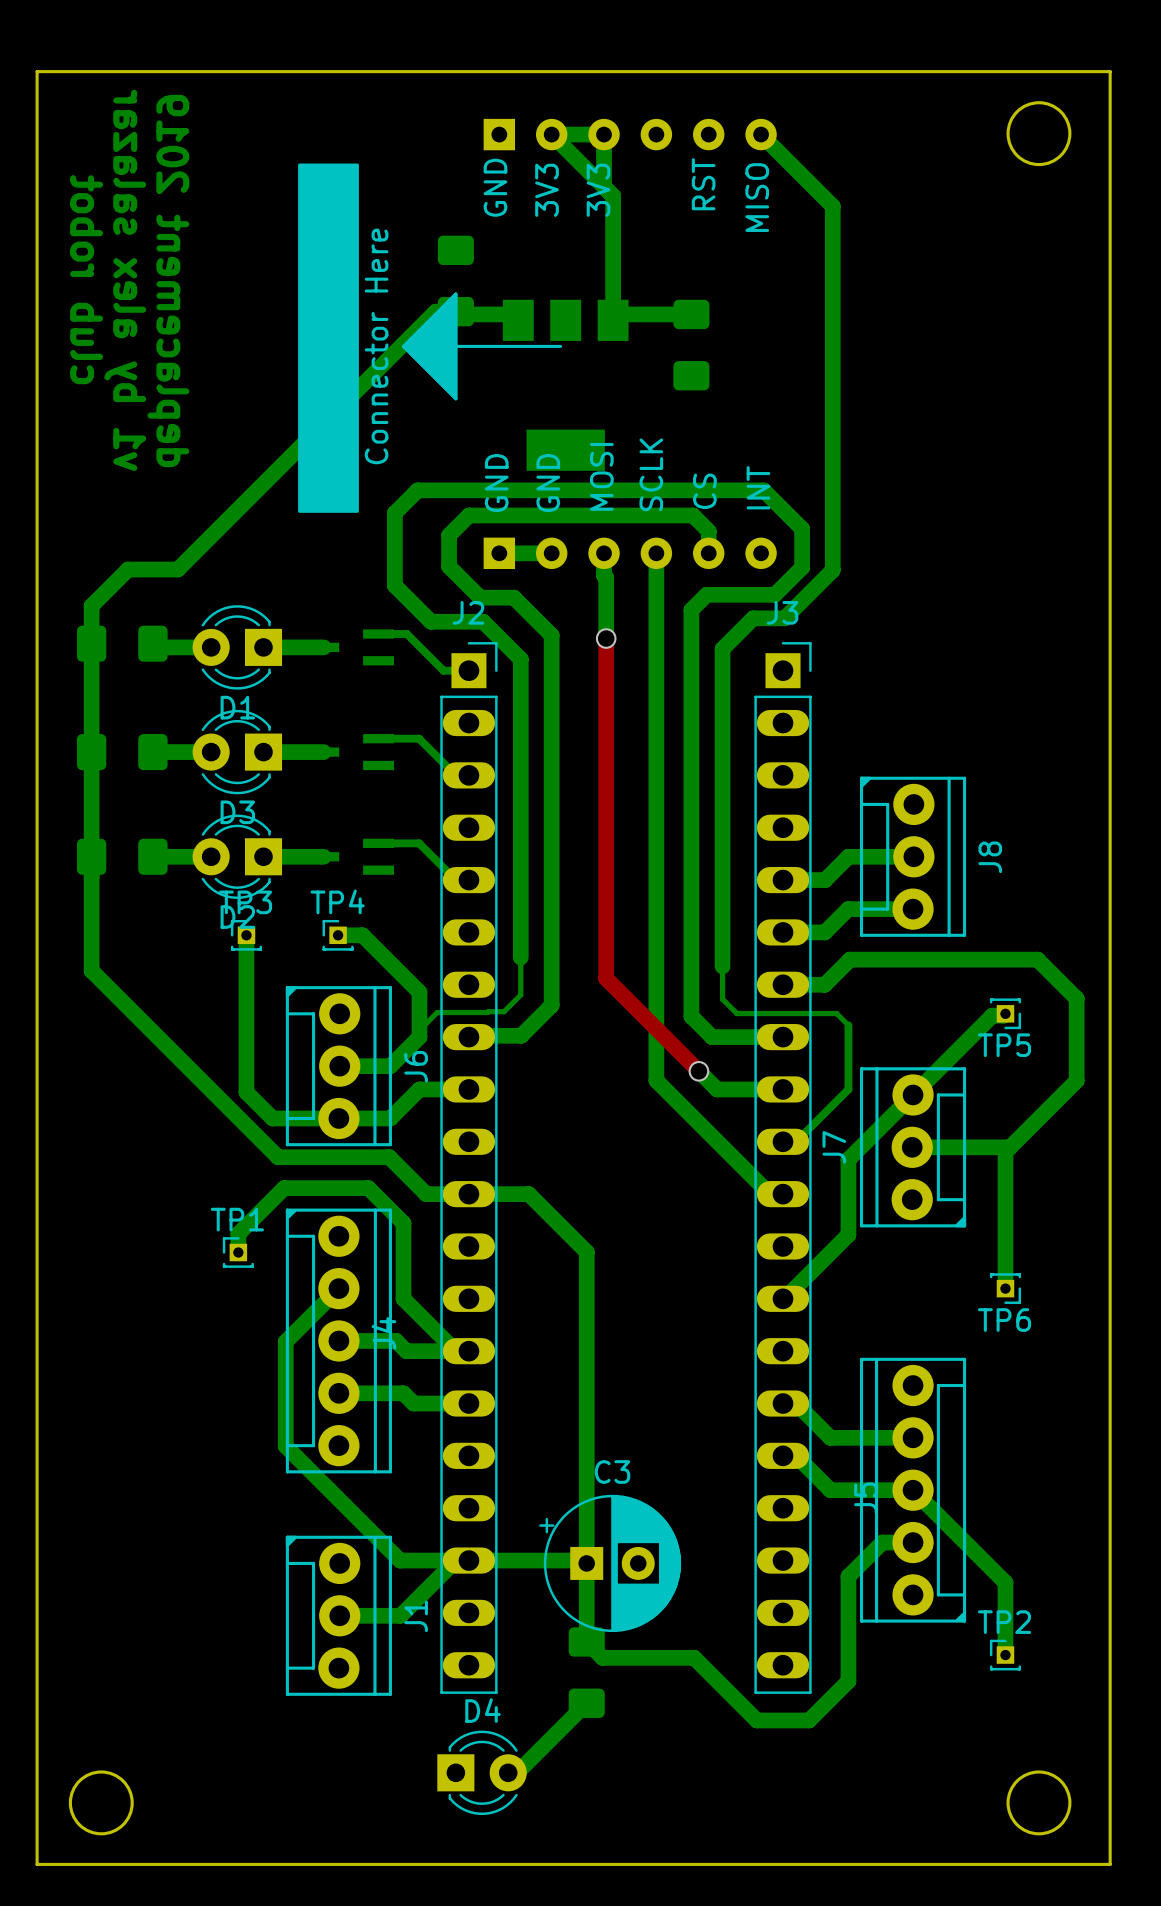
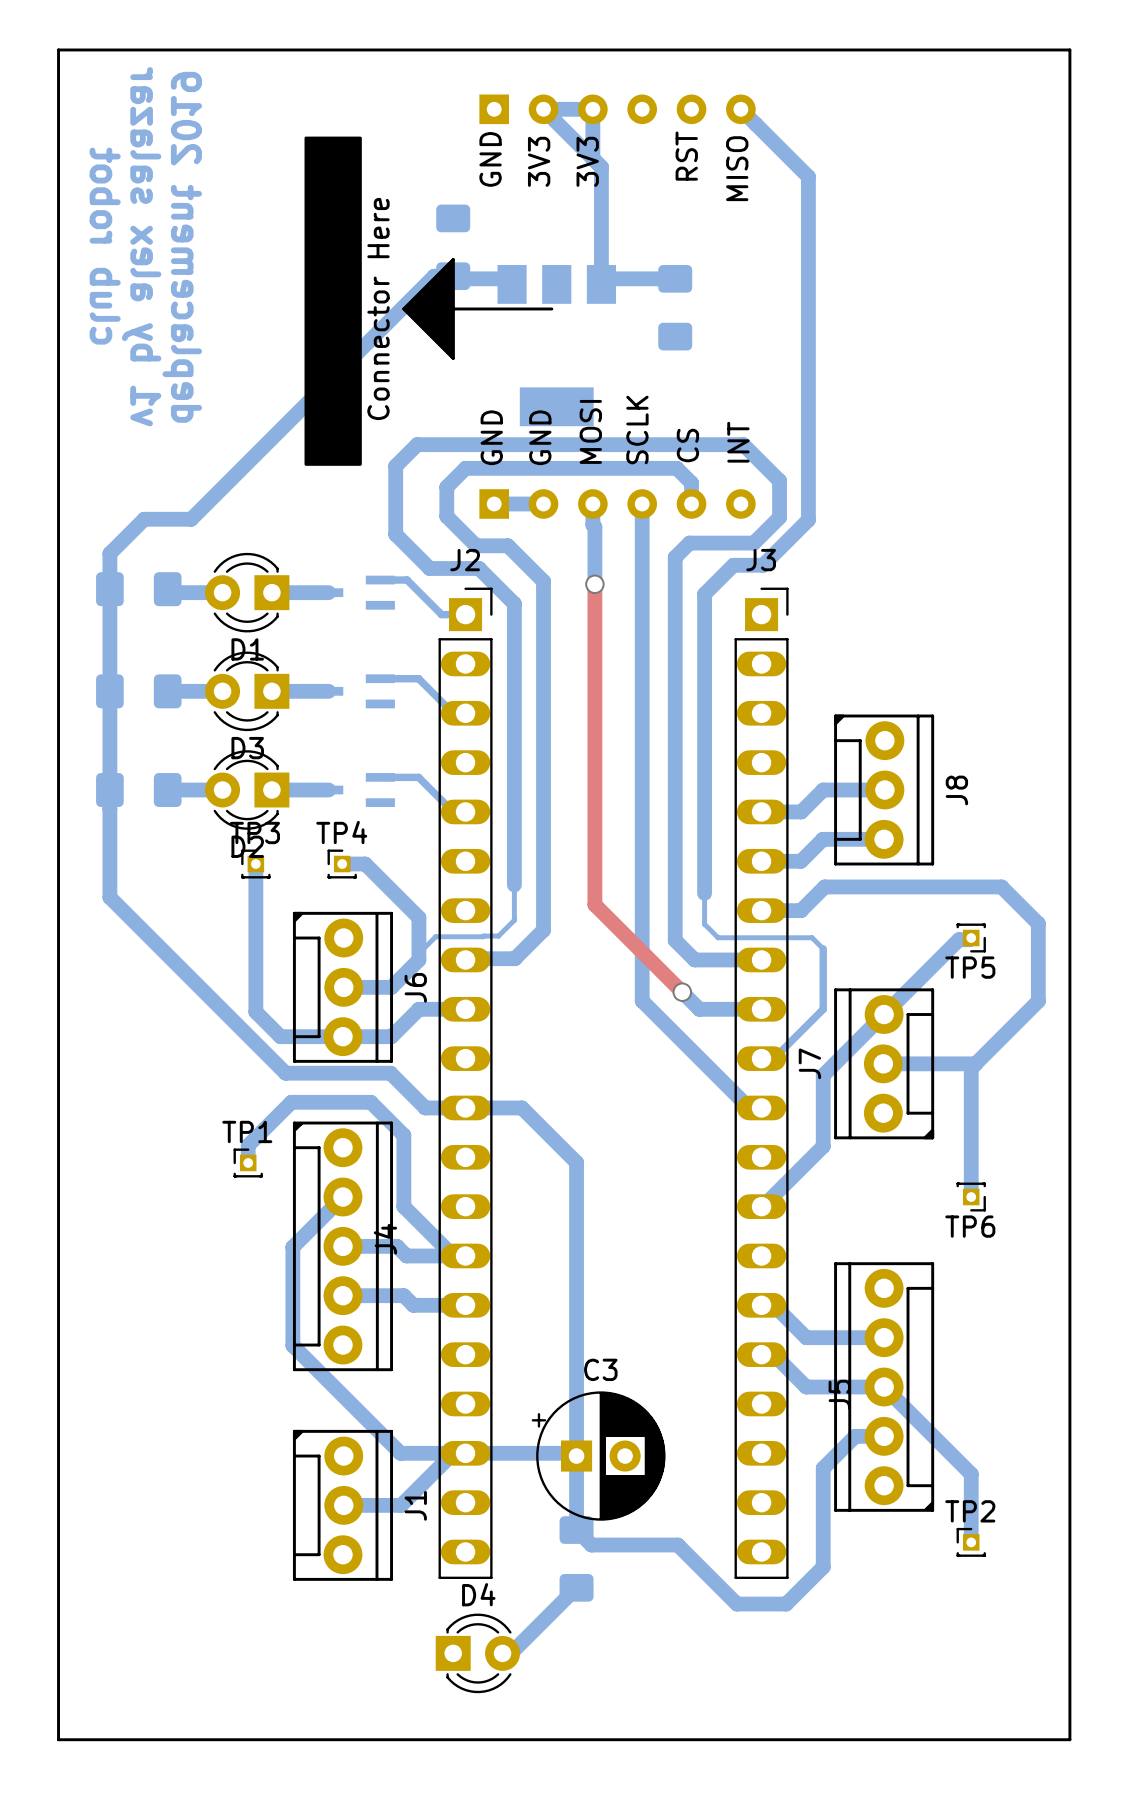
round board edge: [1006, 101, 1072, 167] -> none
round board edge: [68, 1770, 134, 1836] -> none
round board edge: [1006, 1770, 1072, 1836] -> none

